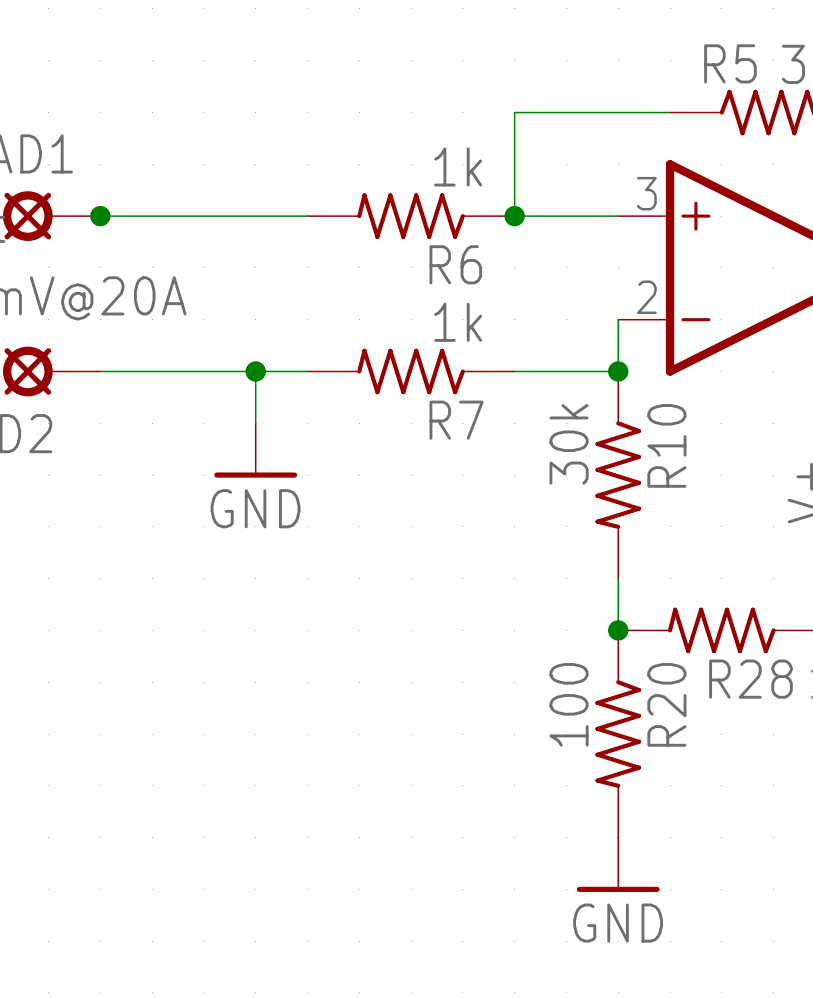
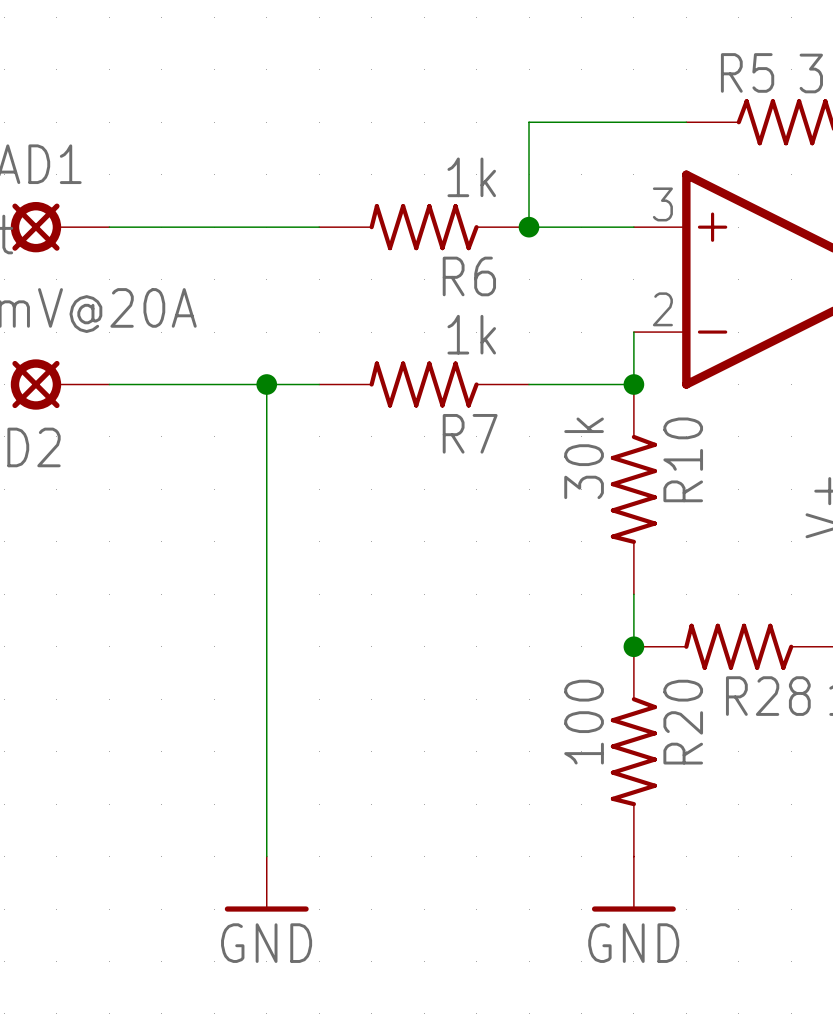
junction: (100, 216) -> none
wire: none -> (266, 436) (266, 856)
power symbol position: GND (255, 450) -> GND (266, 884)

